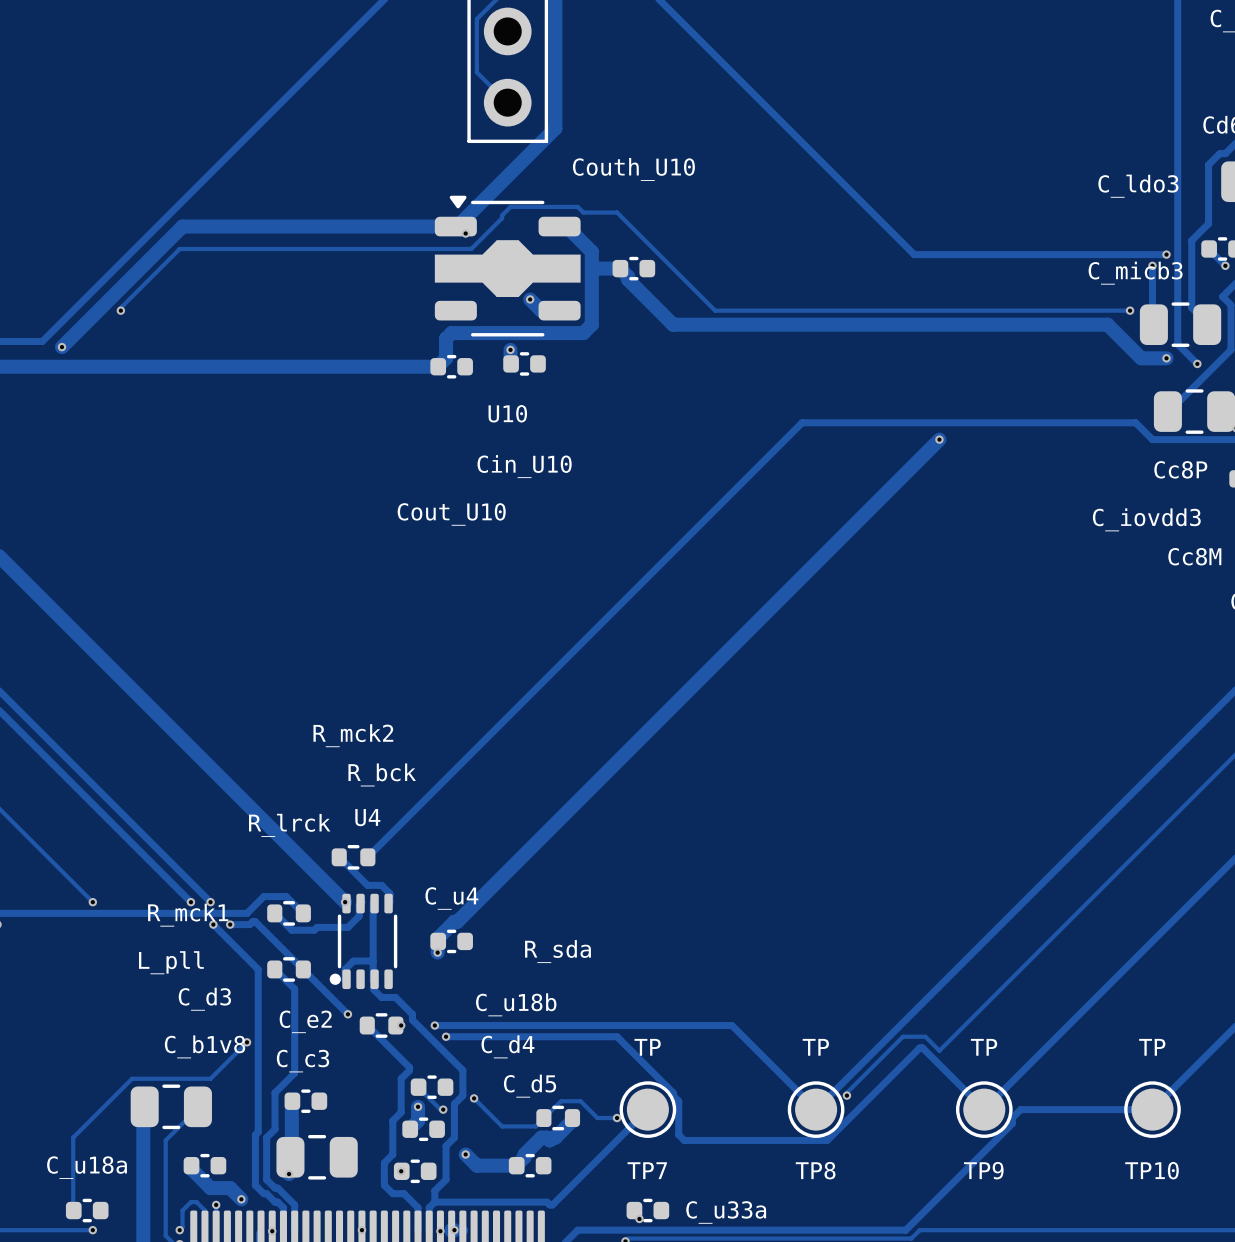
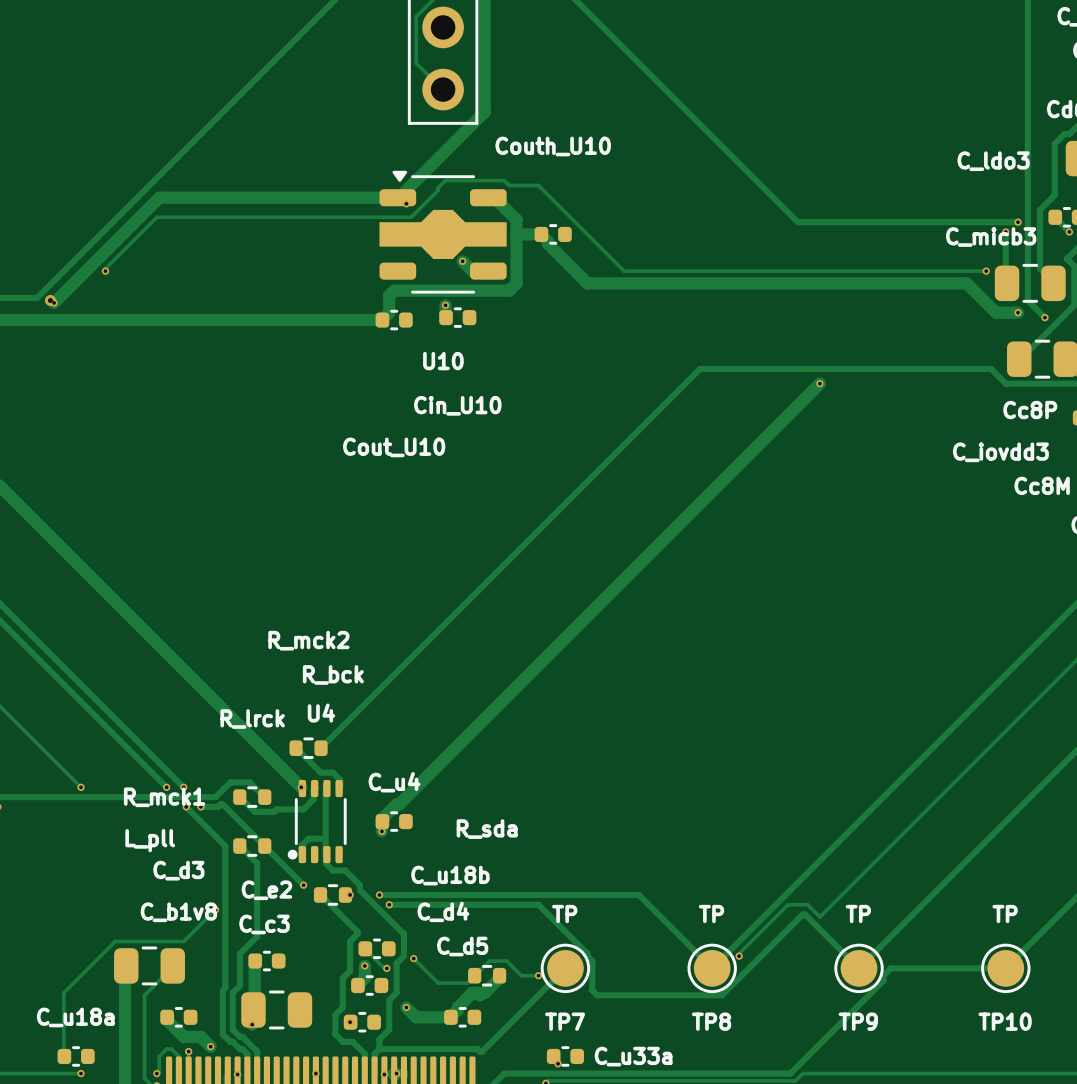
via: none -> (50, 300)

